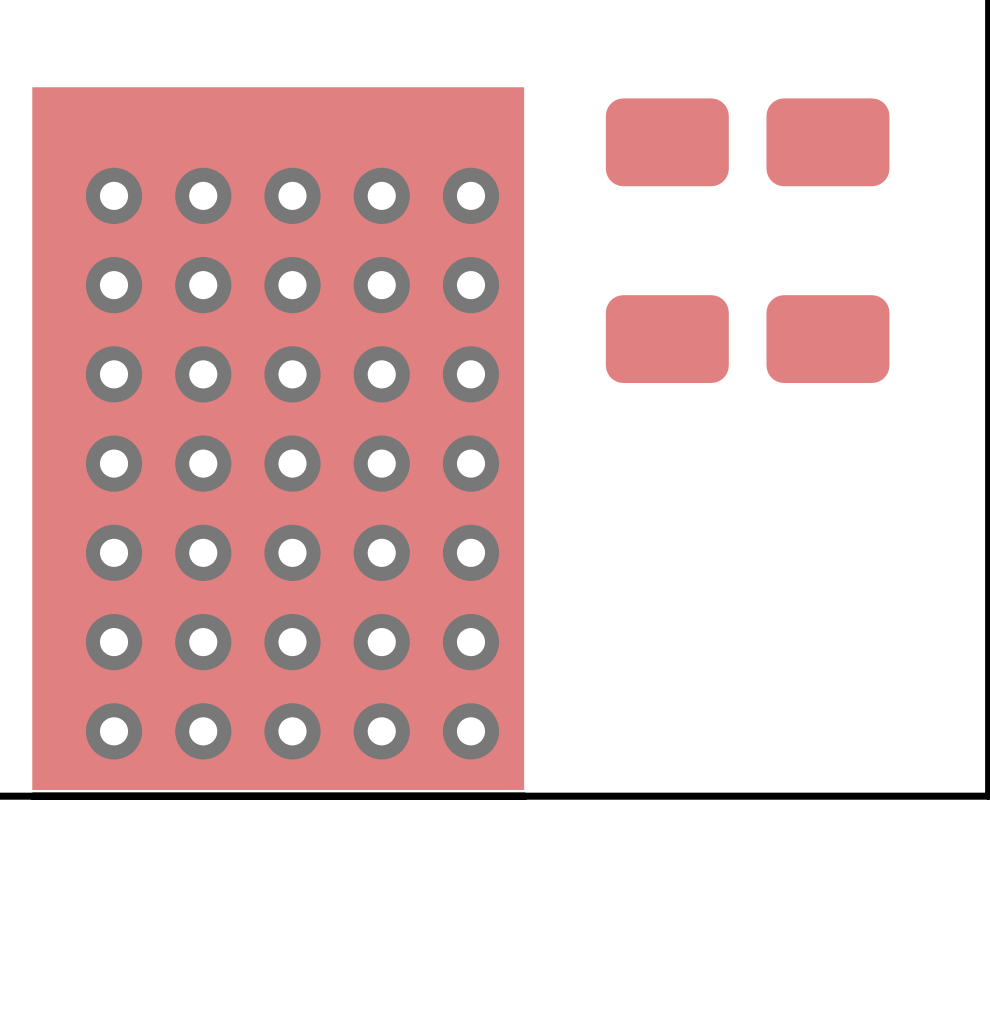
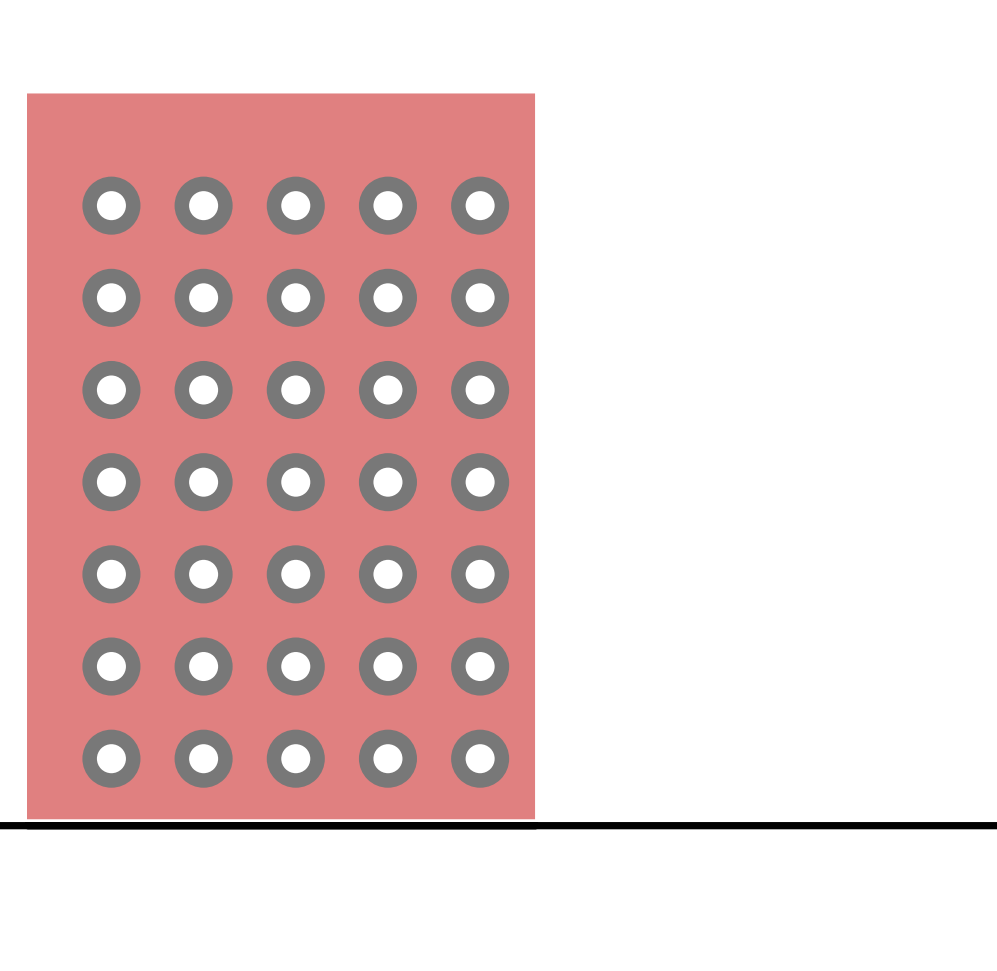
part: (667, 240) -> none
part: (827, 240) -> none

